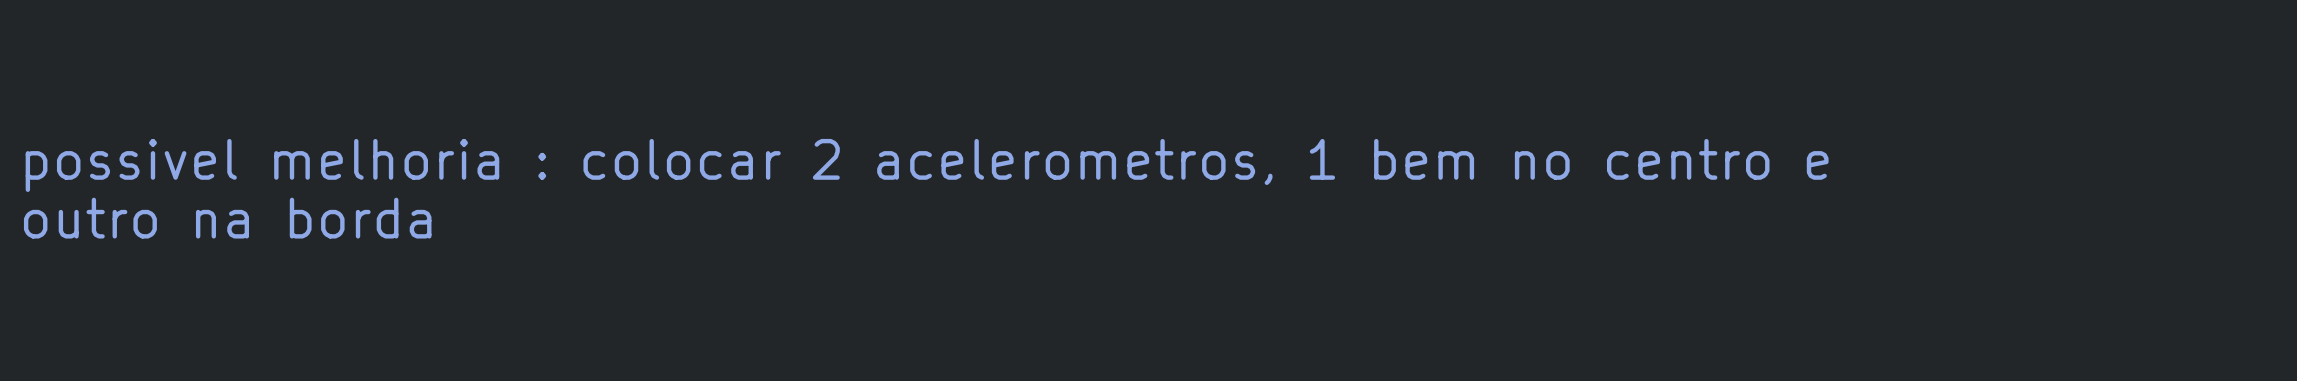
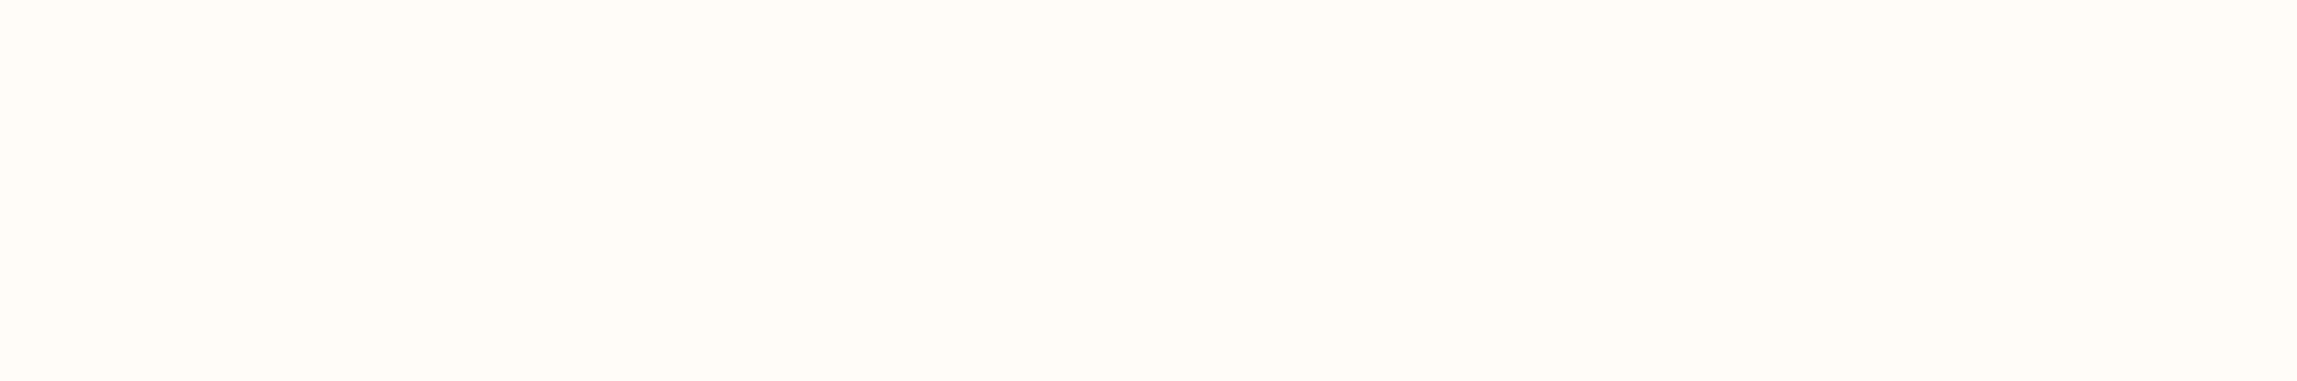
text: possivel melhoria : colocar 2 acelerometros, 1 bem no centro e (927, 165) -> none
text: outro na borda (227, 218) -> none

